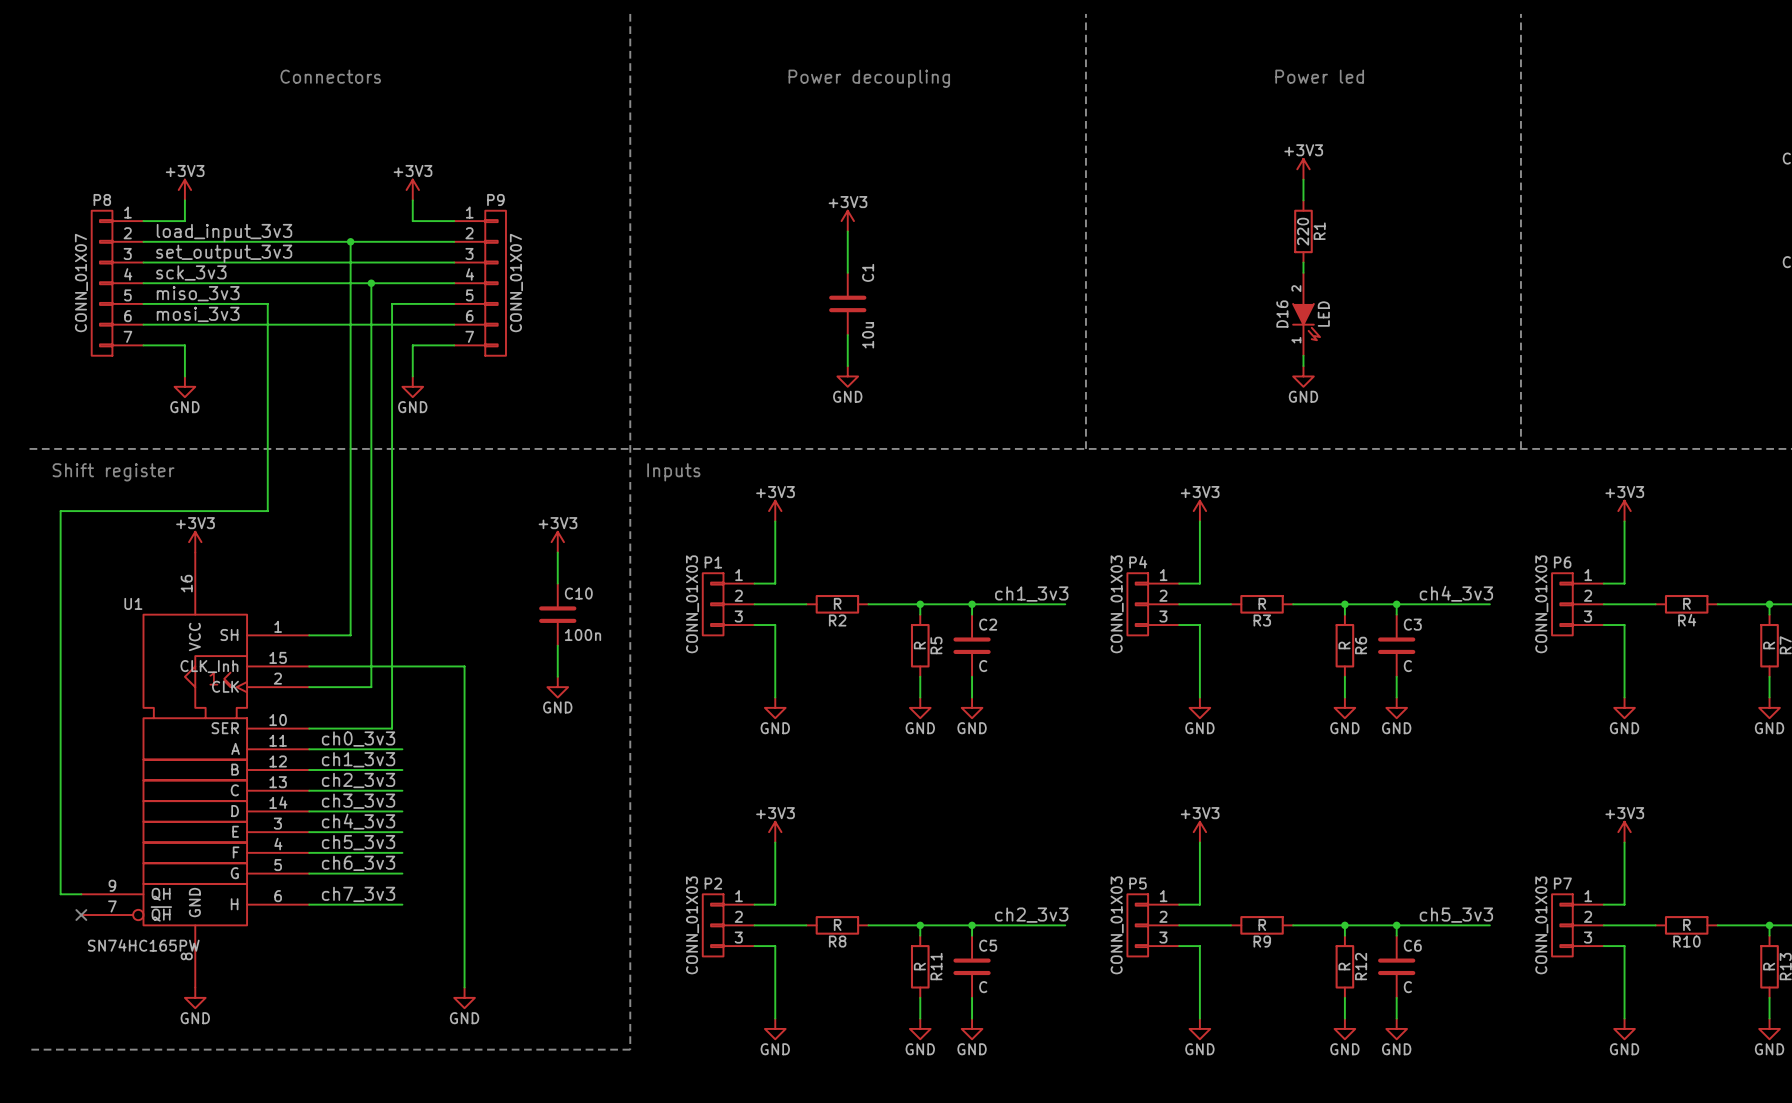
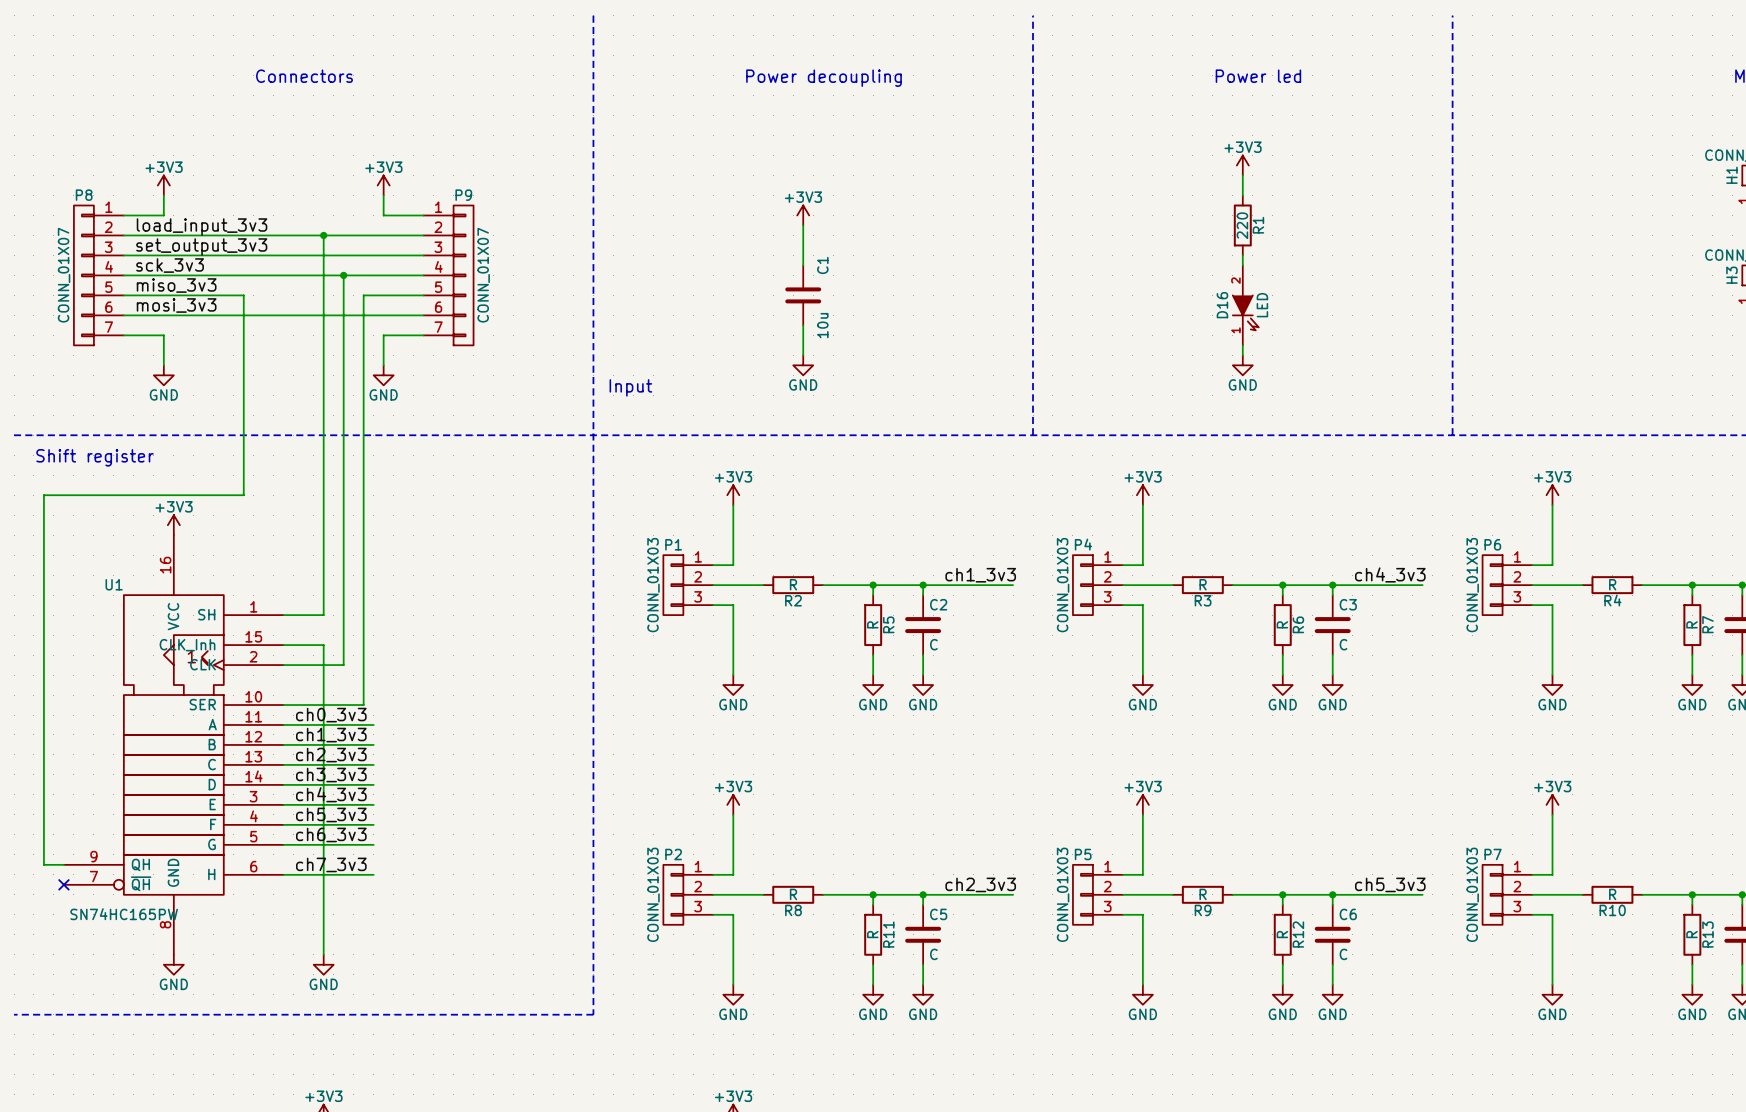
text: none -> Input (630, 387)
text: Inputs (673, 472) -> none
power symbol: +3V3 (557, 542) -> none
wire: (557, 552) (557, 583) -> none
C10: 100n (557, 614) -> none
wire: (557, 645) (557, 676) -> none
wire: (350, 666) (464, 666) (464, 987) -> (323, 645) (323, 954)
power symbol: GND (557, 687) -> none
power symbol position: GND (464, 997) -> GND (323, 964)

